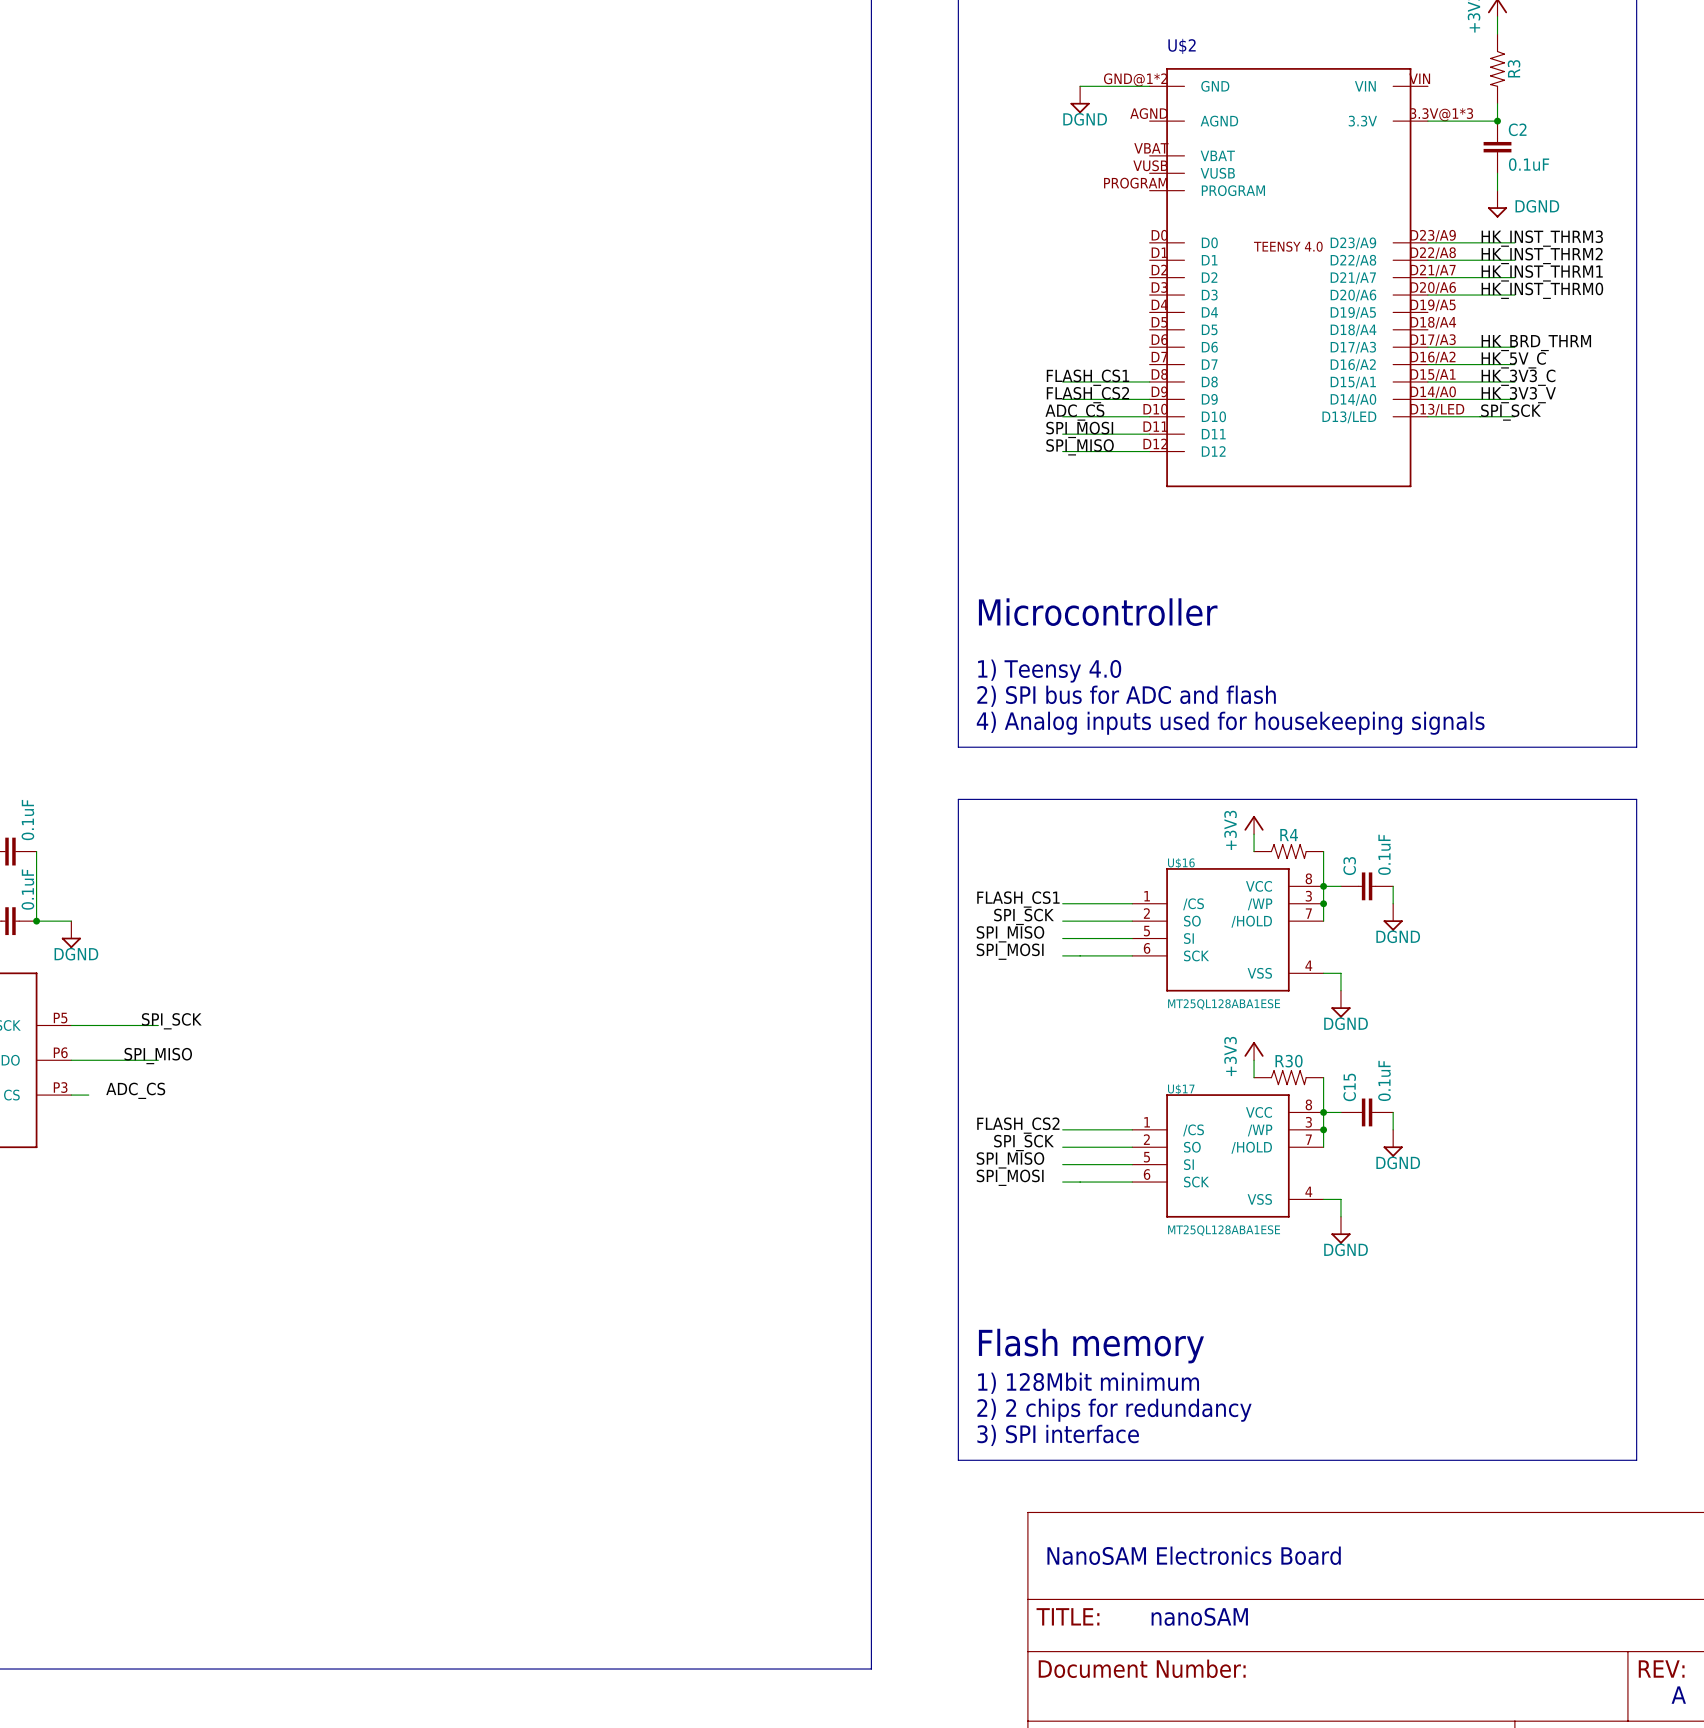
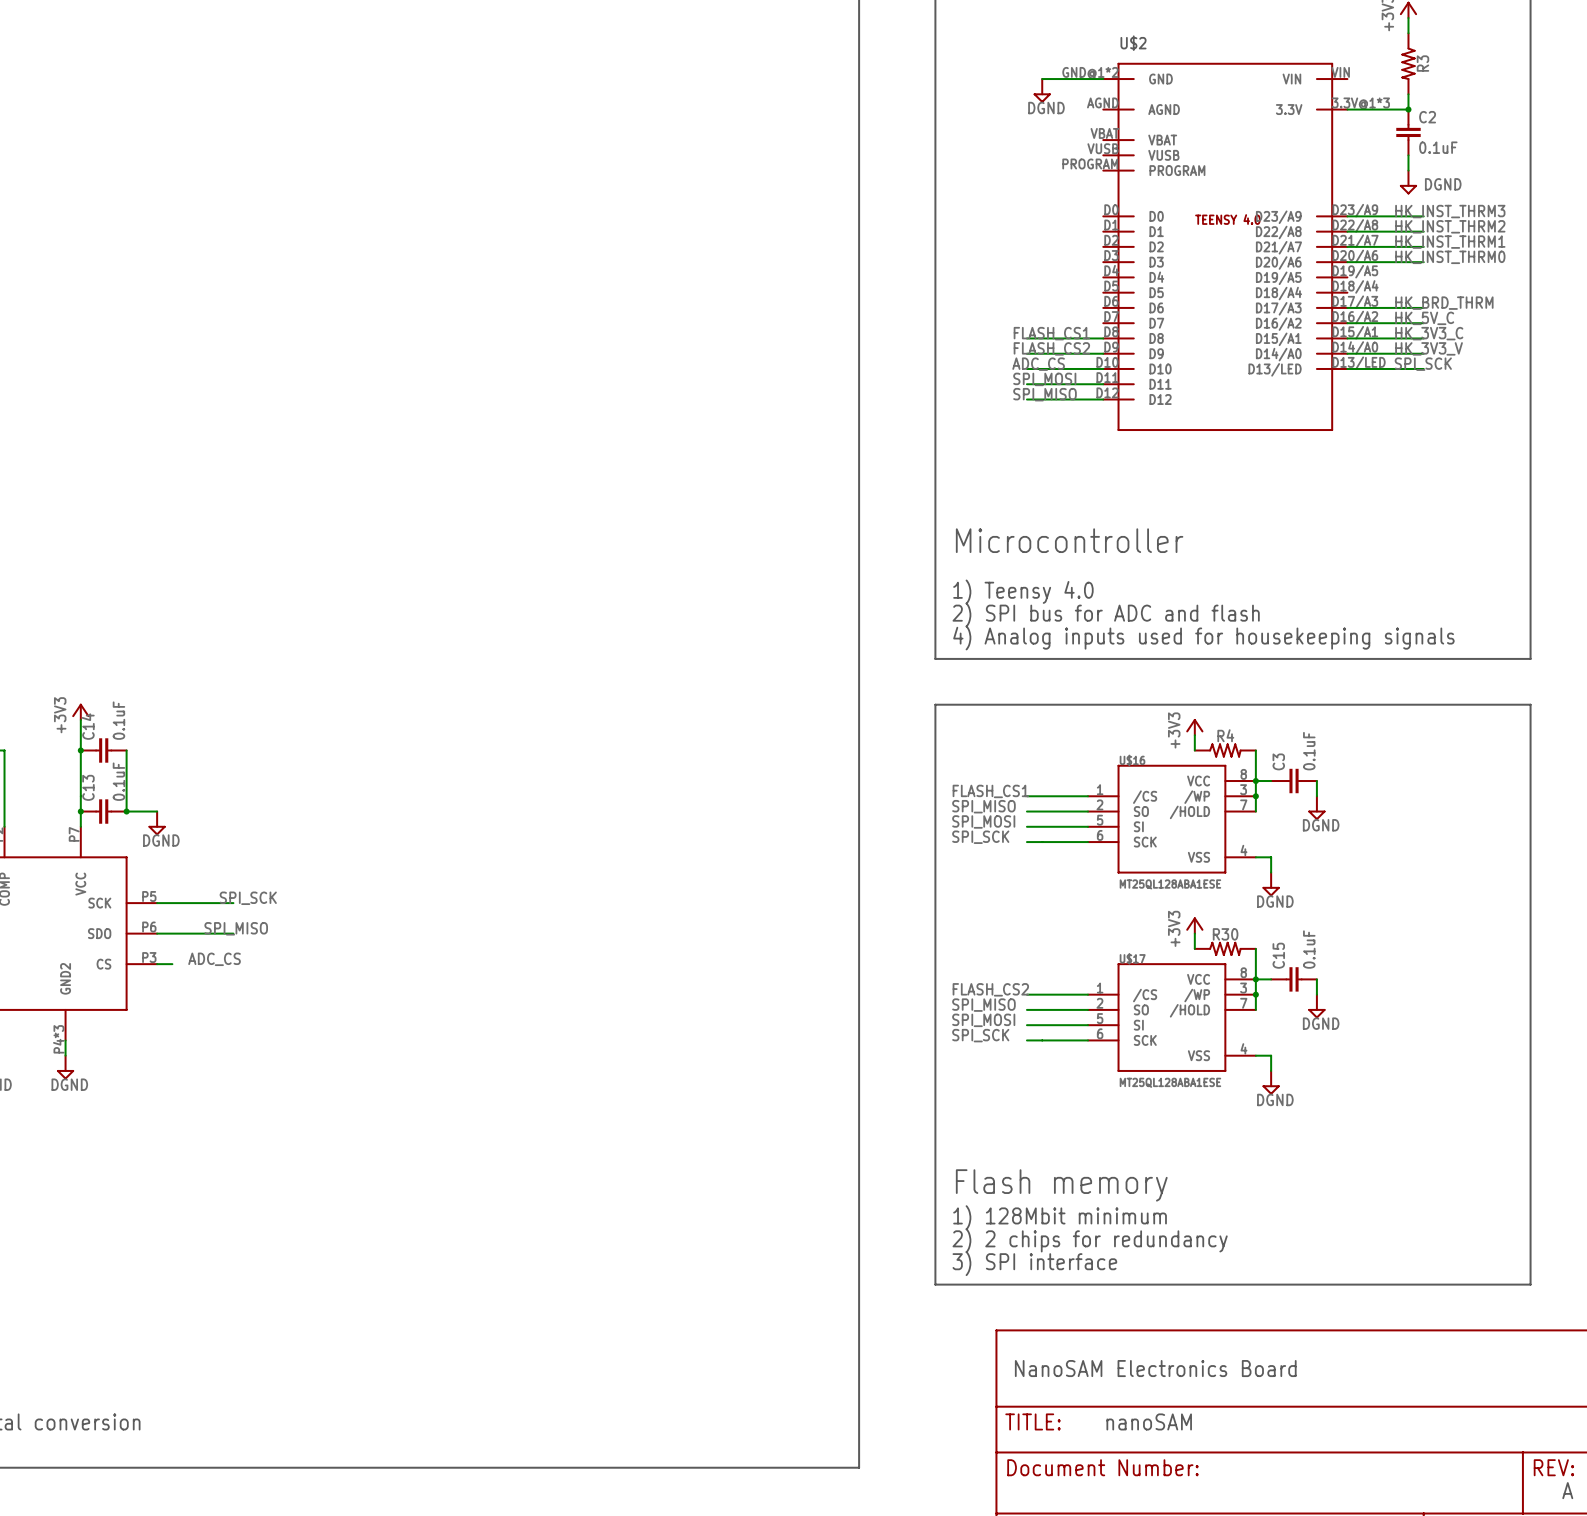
label: SPI_SCK (1024, 916) -> SPI_MISO (983, 806)
label: SPI_MISO (1010, 934) -> SPI_MOSI (983, 821)
label: SPI_MOSI (1010, 951) -> SPI_SCK (980, 837)
label: SPI_SCK (1024, 1143) -> SPI_MISO (983, 1005)
label: SPI_MISO (1010, 1160) -> SPI_MOSI (983, 1020)
label: SPI_MOSI (1010, 1177) -> SPI_SCK (980, 1035)

